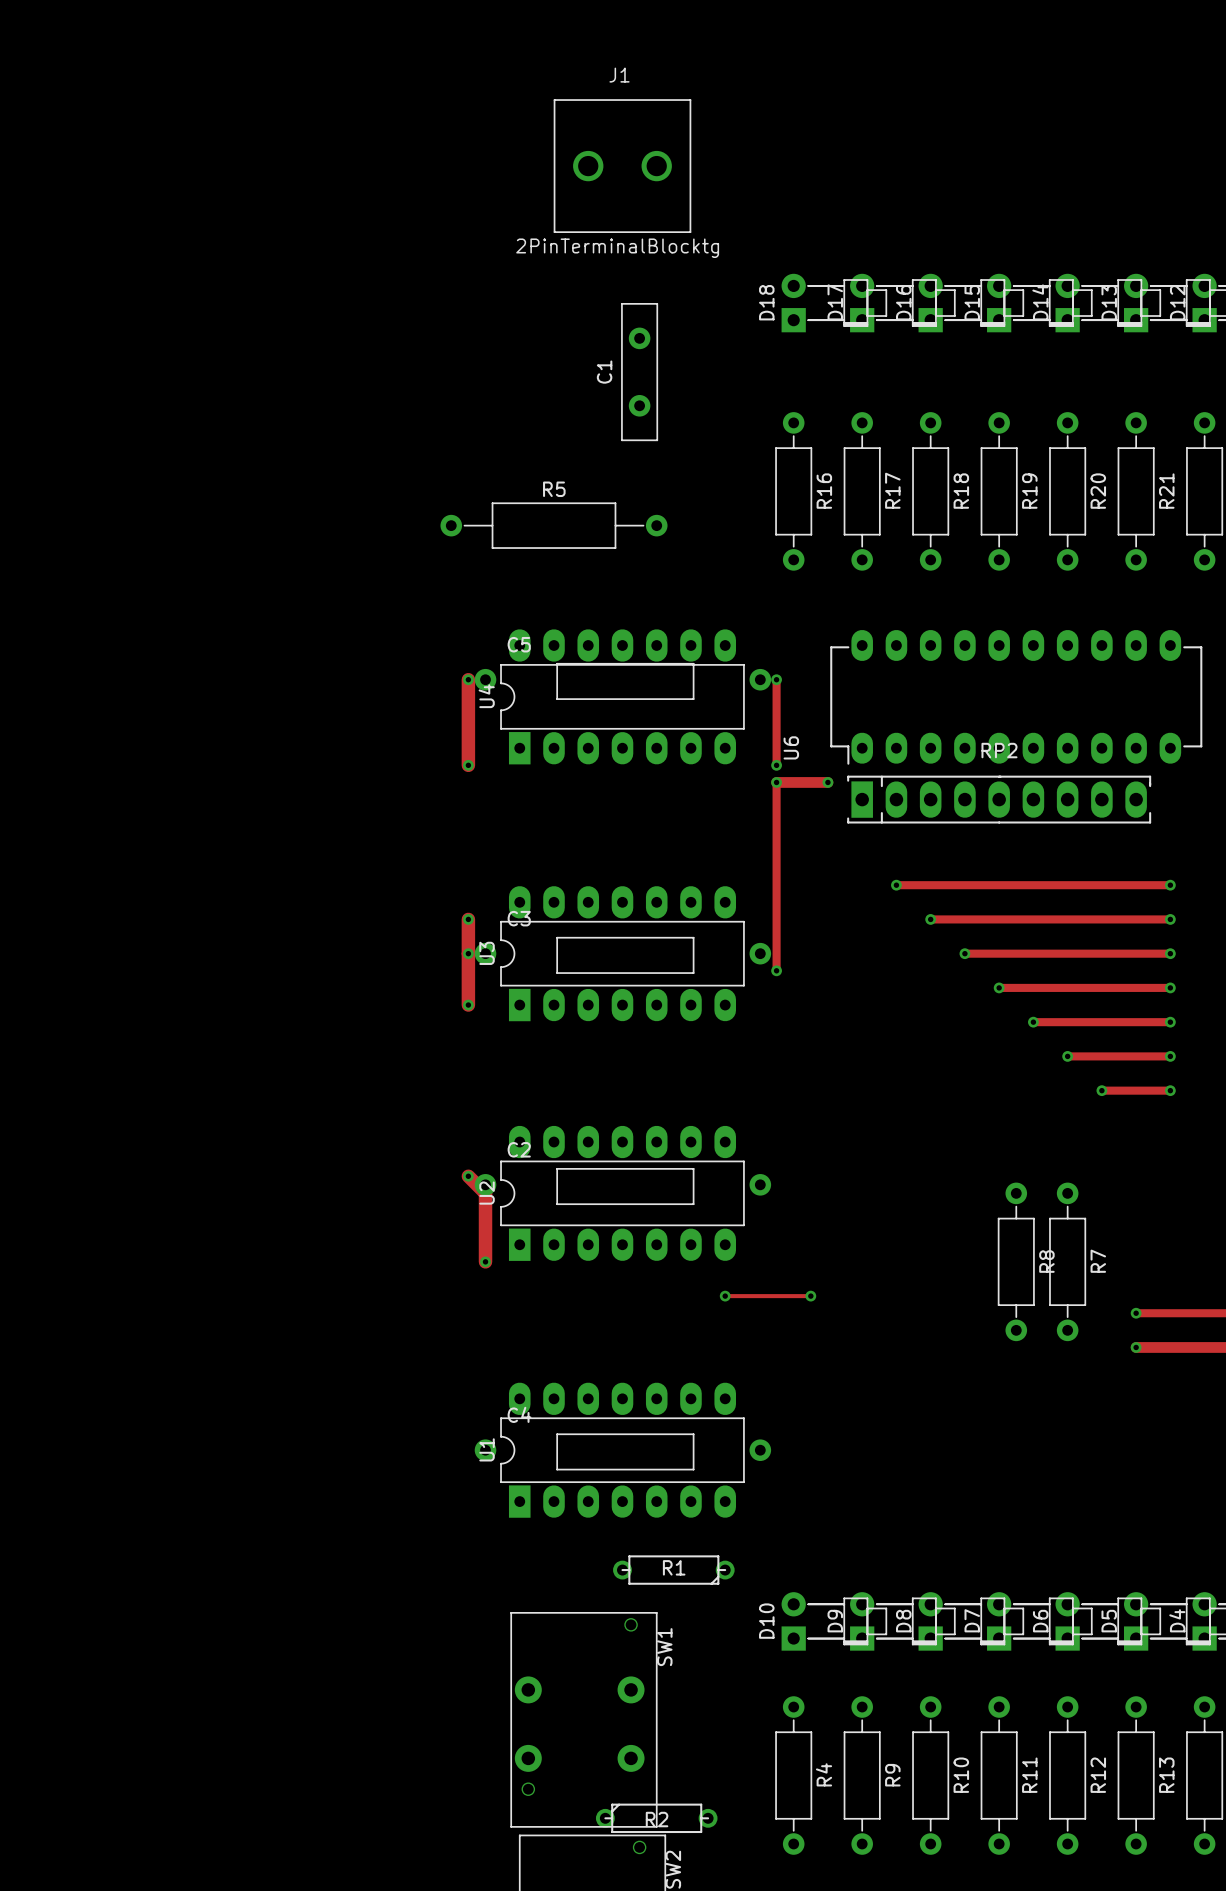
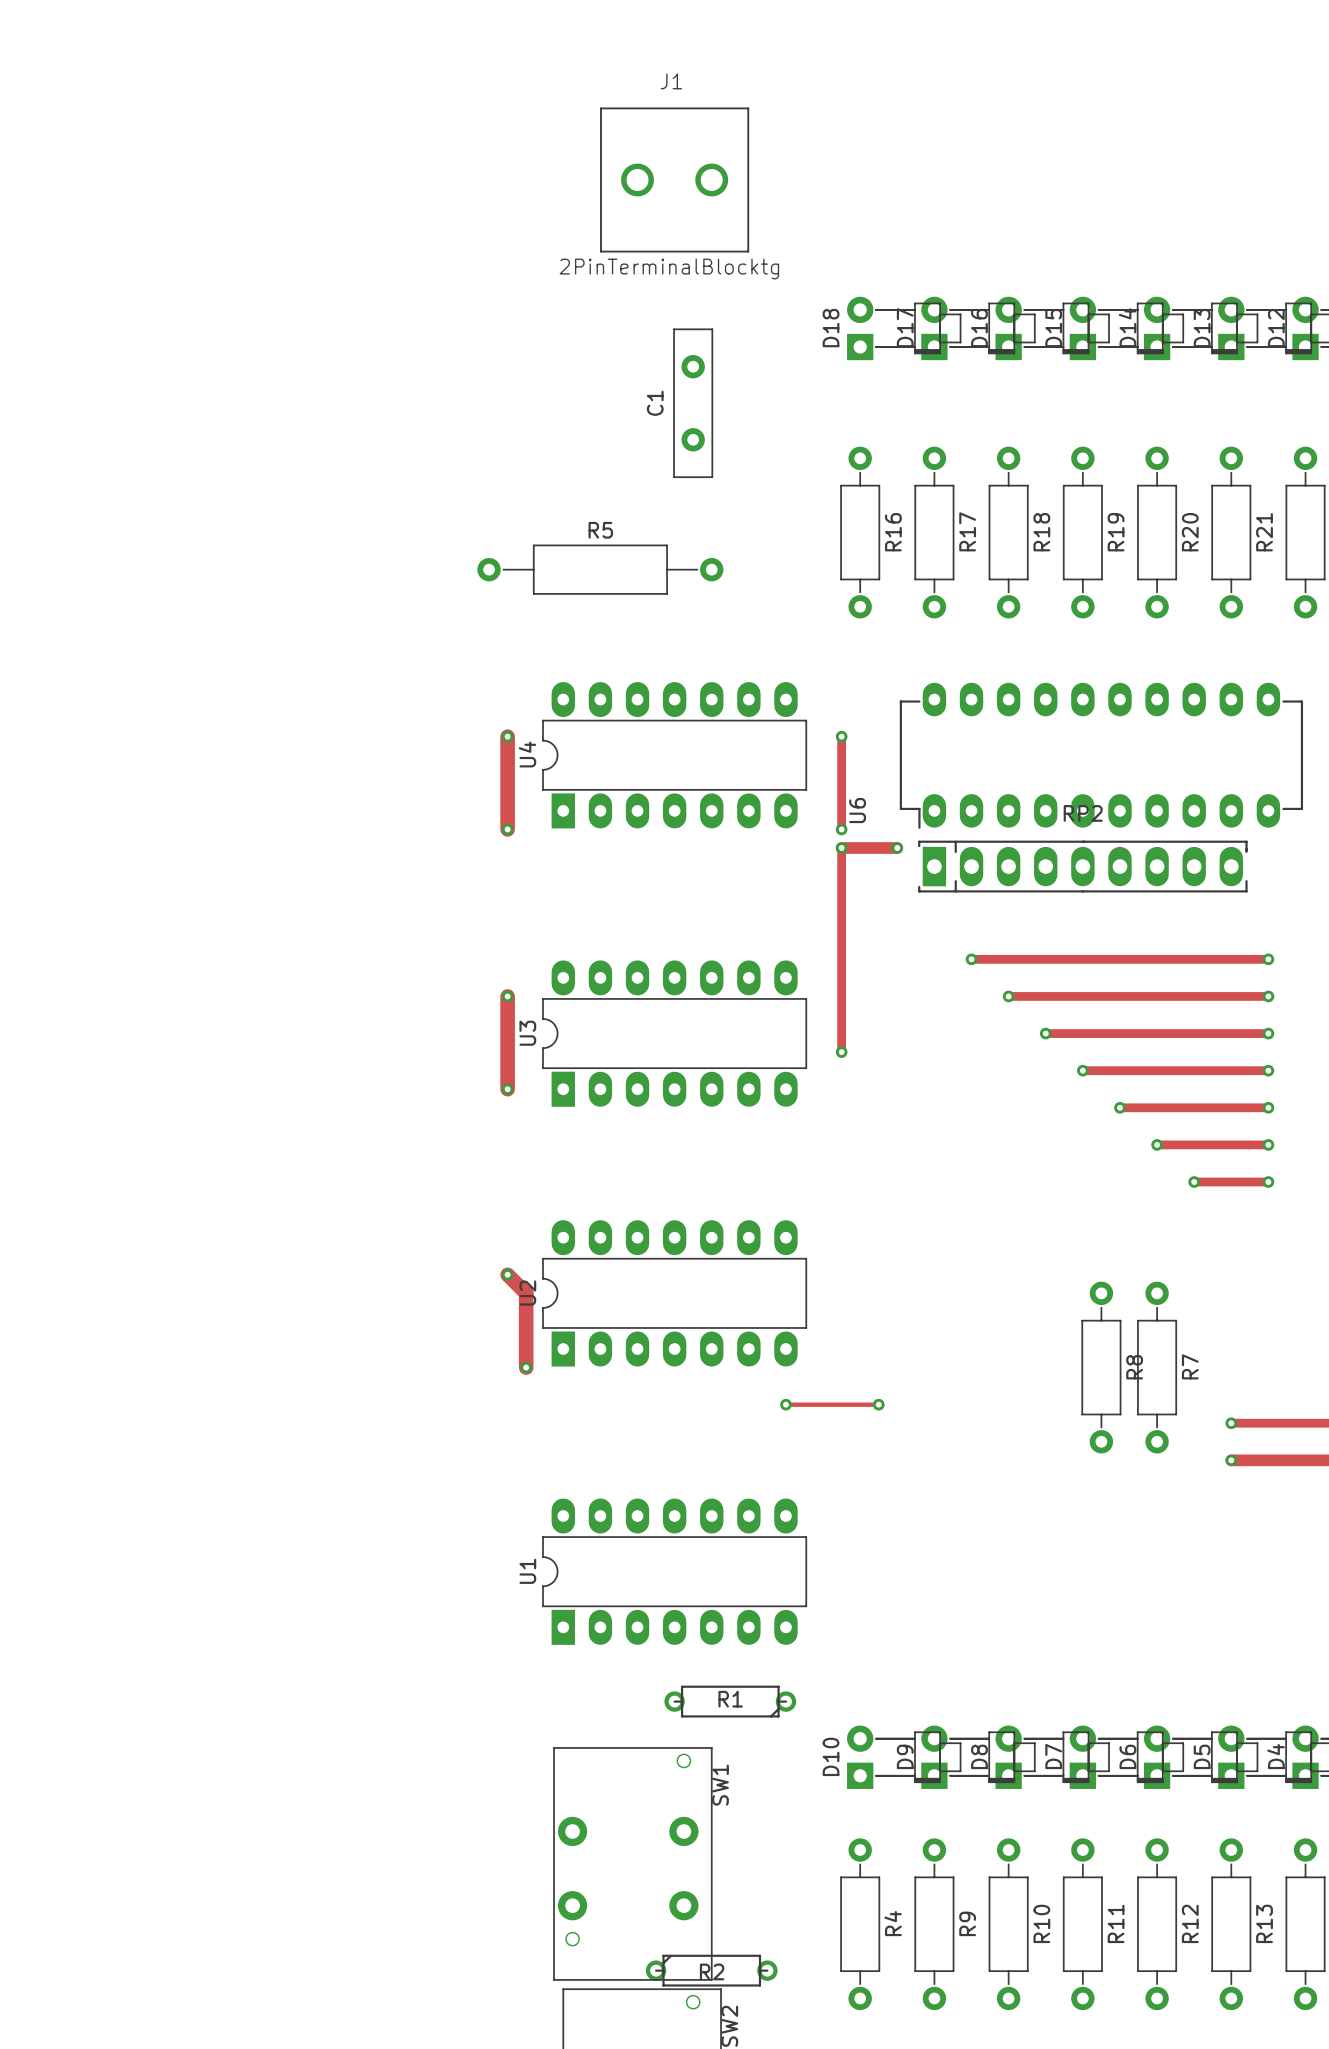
C5: (622, 681) -> none
via: (468, 953) -> none
C3: (622, 955) -> none
C2: (622, 1186) -> none
C4: (622, 1451) -> none

